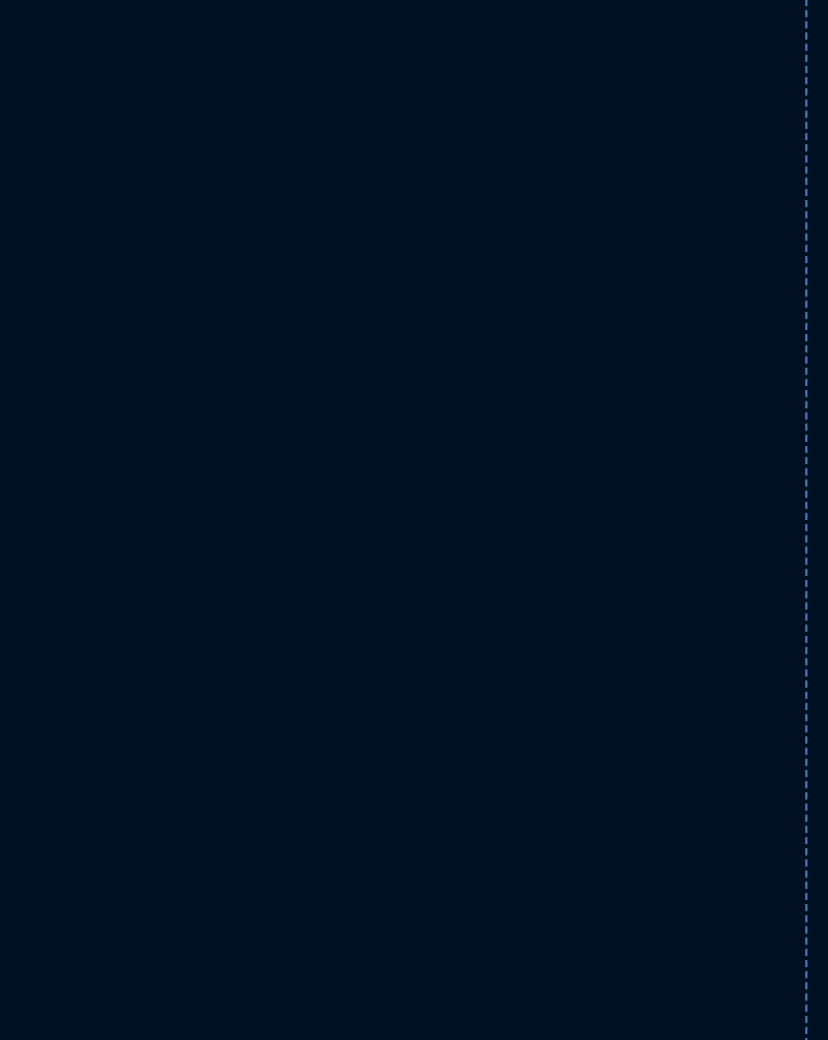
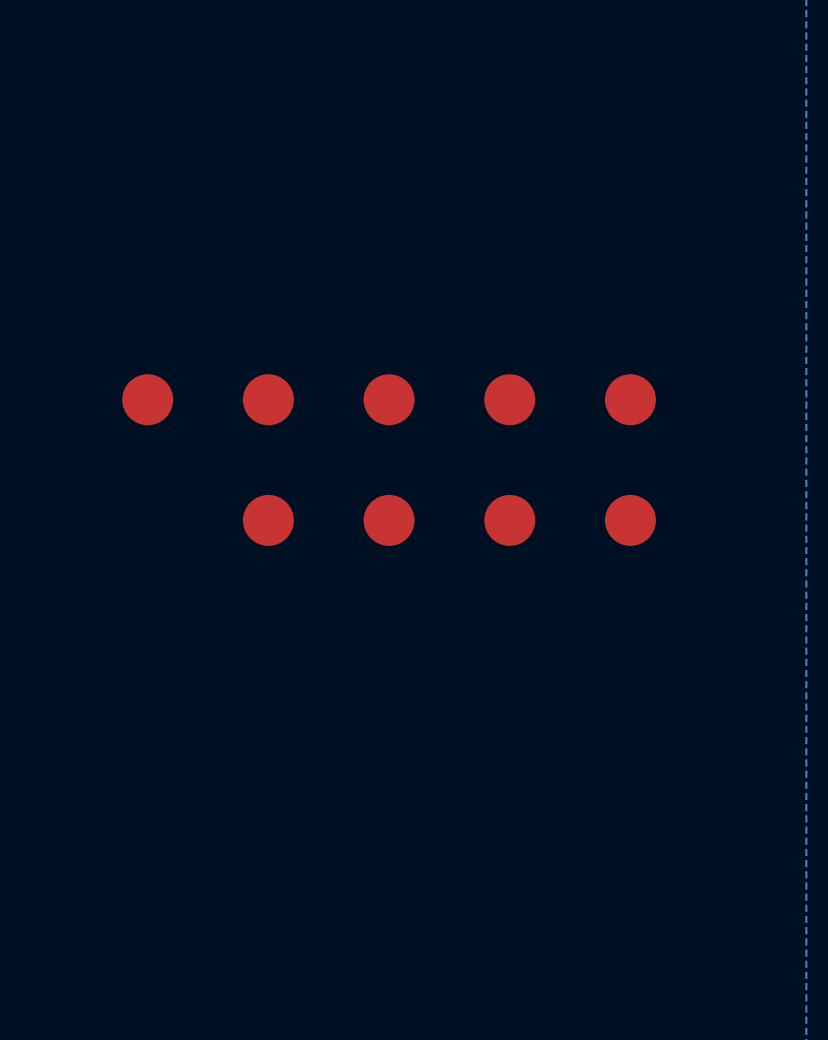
part: none -> (147, 399)
part: none -> (268, 399)
part: none -> (389, 399)
part: none -> (509, 399)
part: none -> (630, 399)
part: none -> (268, 520)
part: none -> (389, 520)
part: none -> (509, 520)
part: none -> (630, 520)

